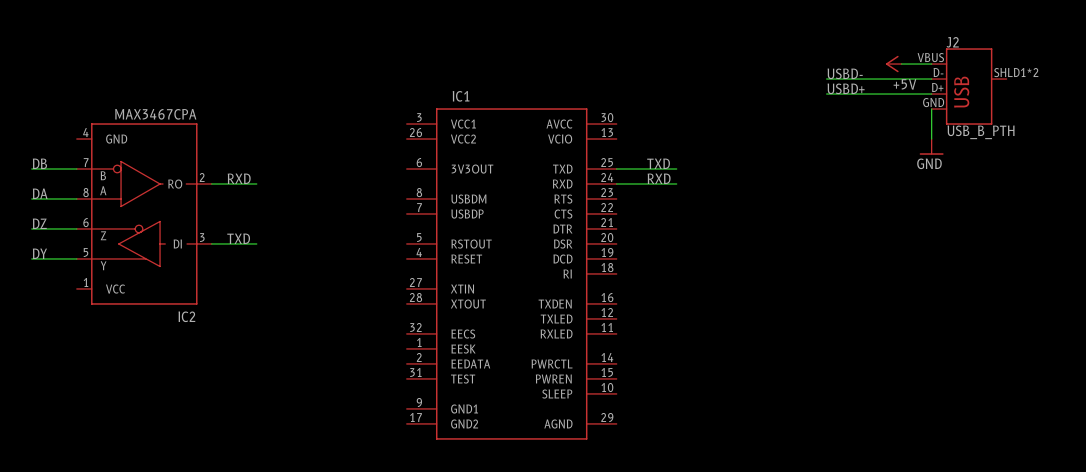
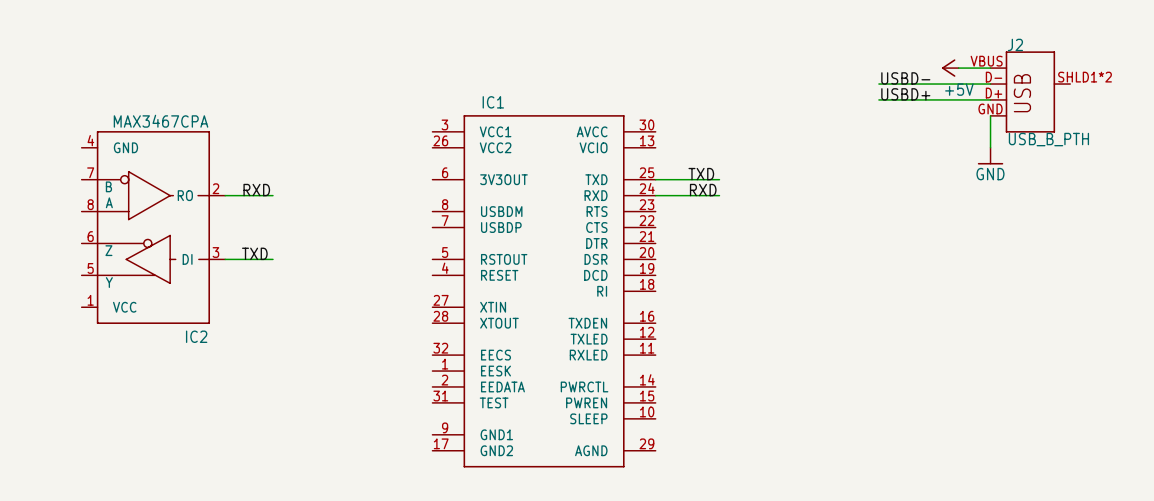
label: DB (39, 163) -> none
wire: (31, 169) (76, 169) -> none
label: DA (40, 193) -> none
wire: (31, 198) (76, 198) -> none
label: DZ (39, 223) -> none
wire: (31, 228) (76, 228) -> none
label: DY (39, 253) -> none
wire: (31, 258) (76, 258) -> none

